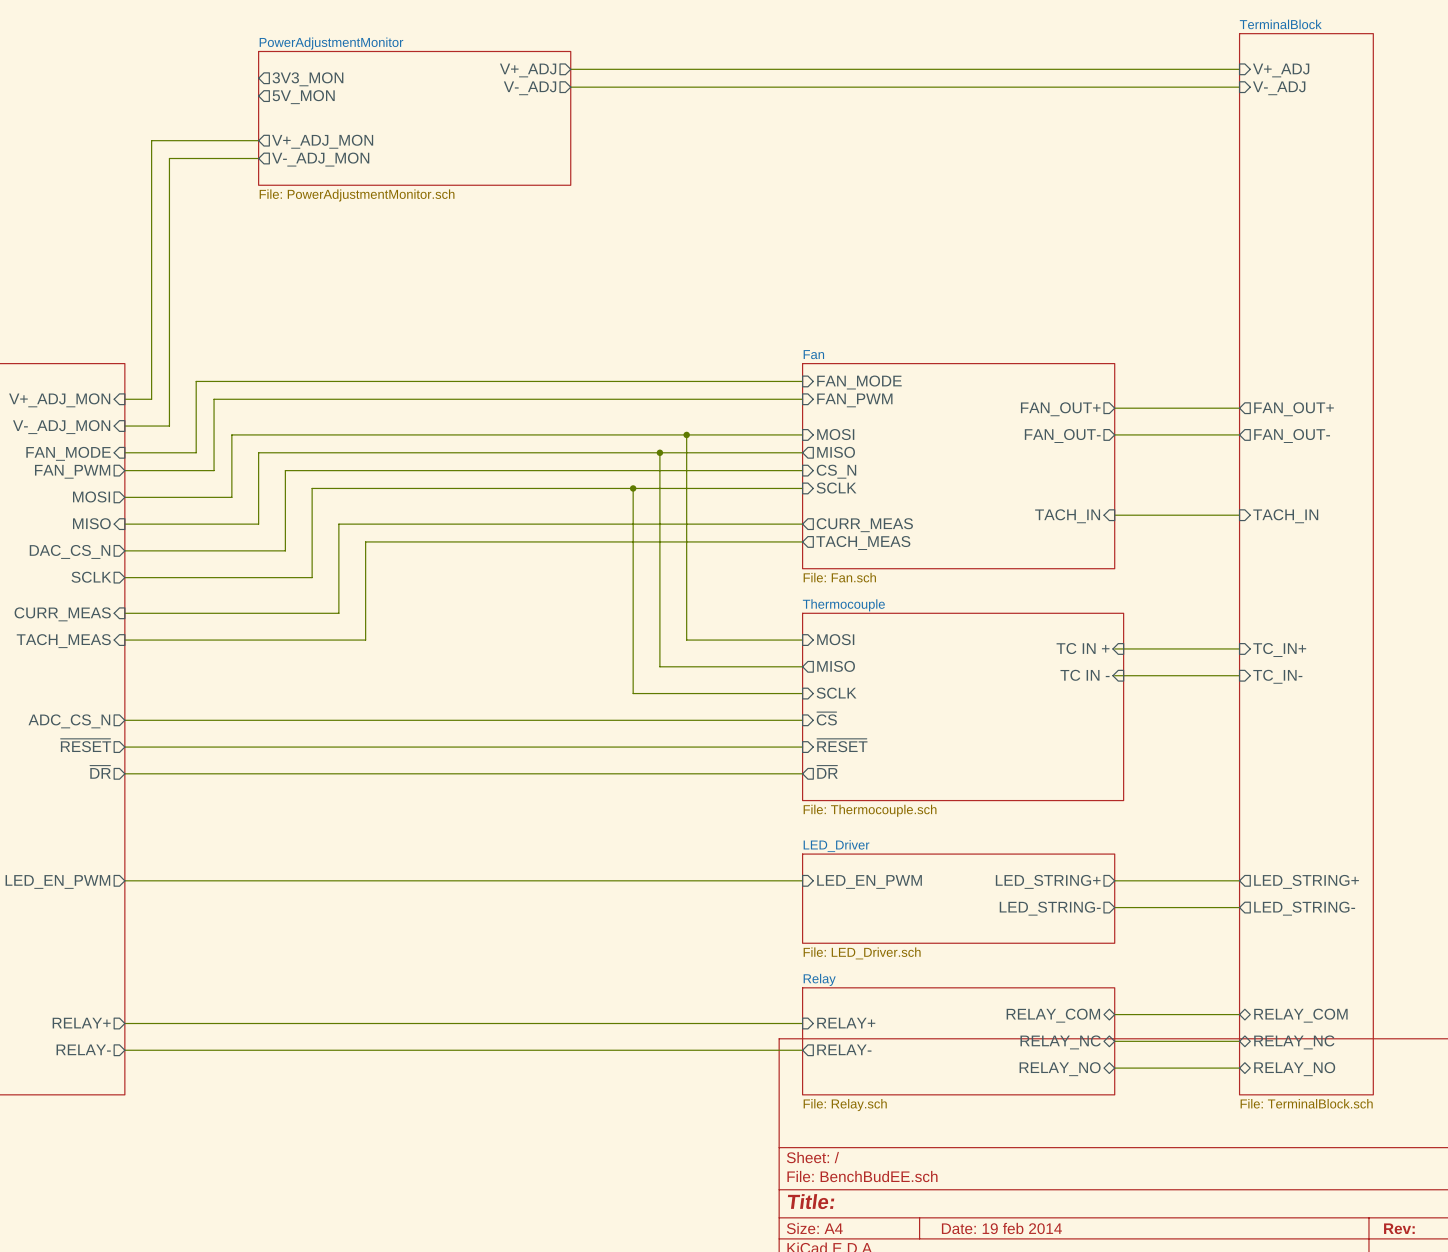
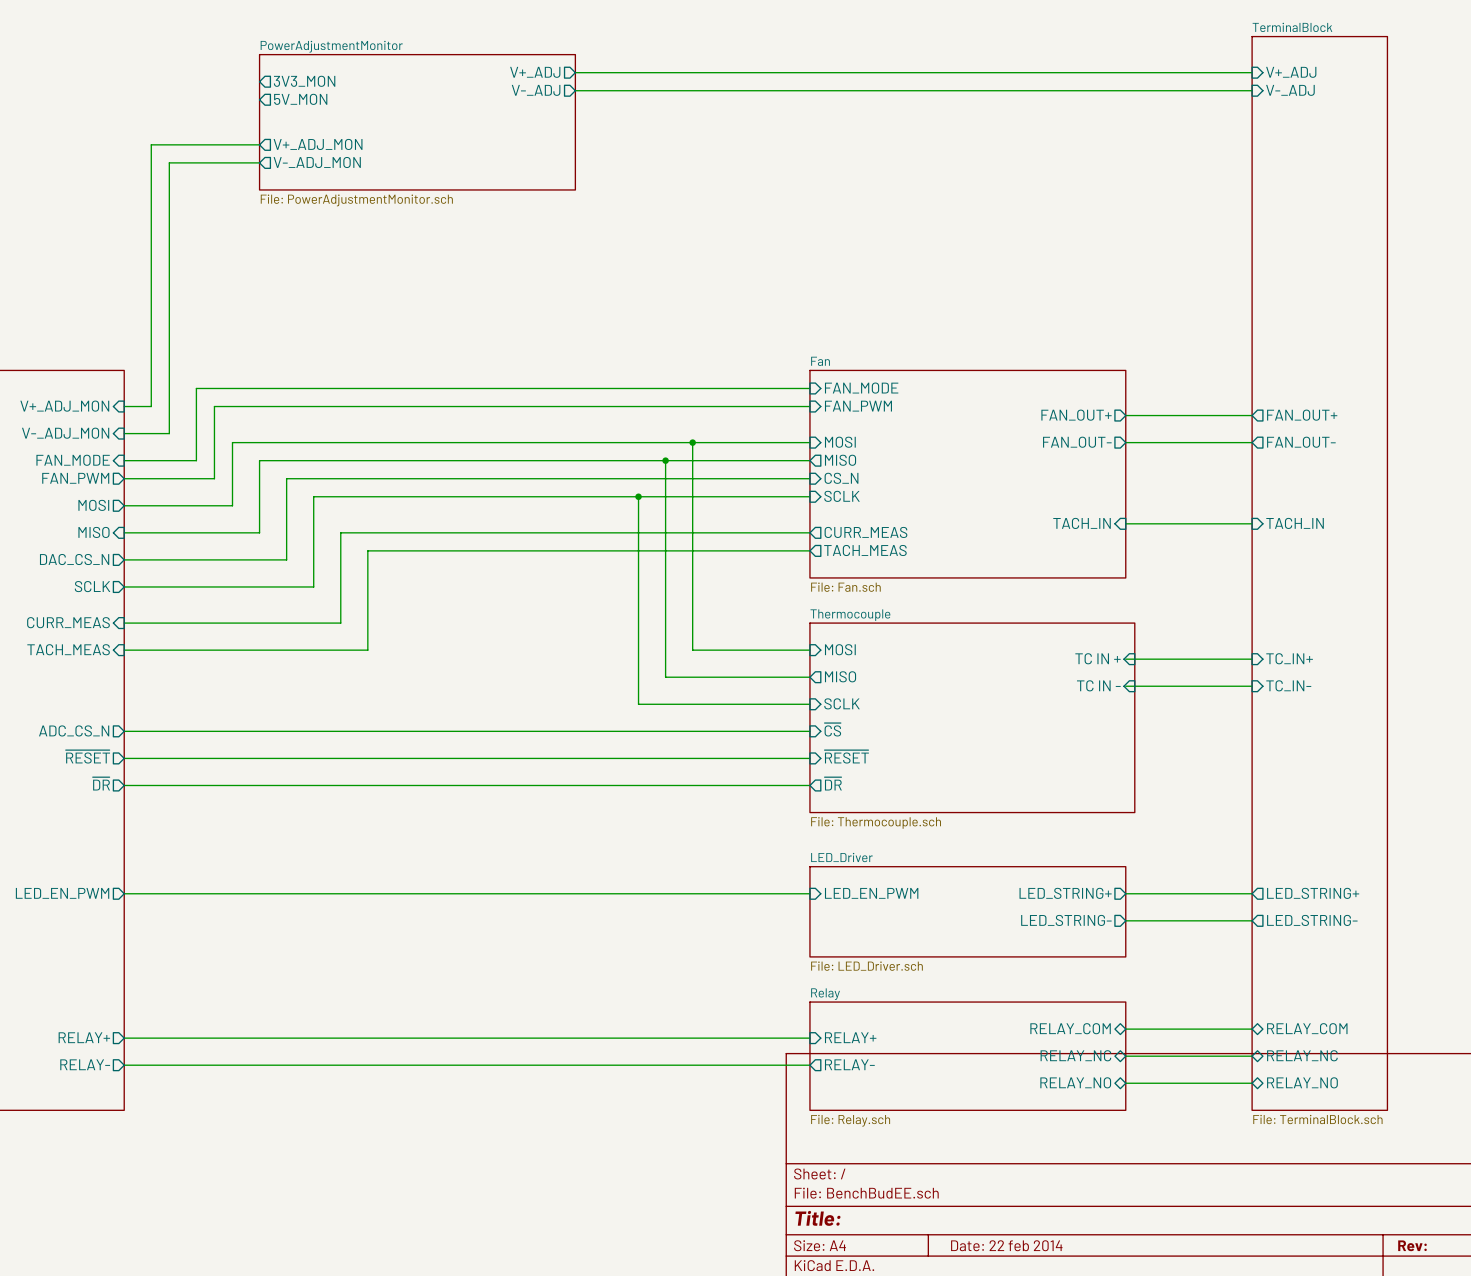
title block: Date: 19 feb 2014 (1001, 1228) -> Date: 22 feb 2014 (1006, 1245)

